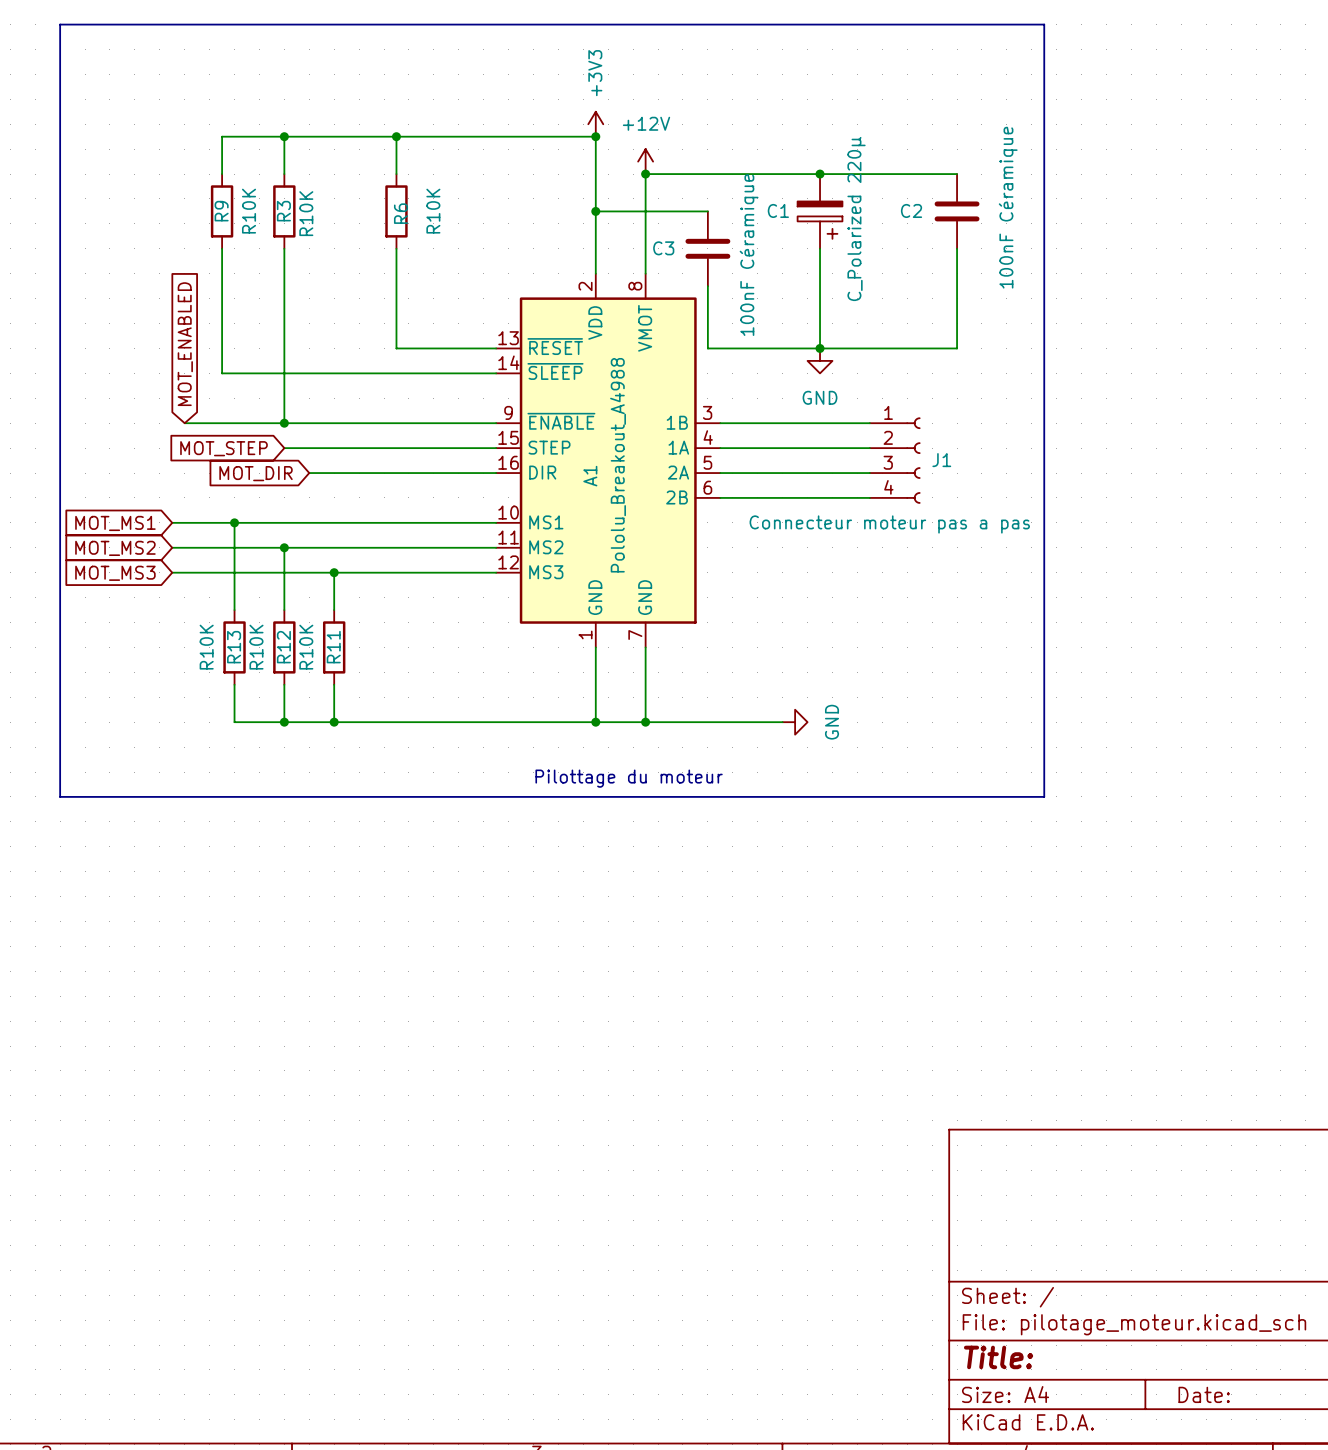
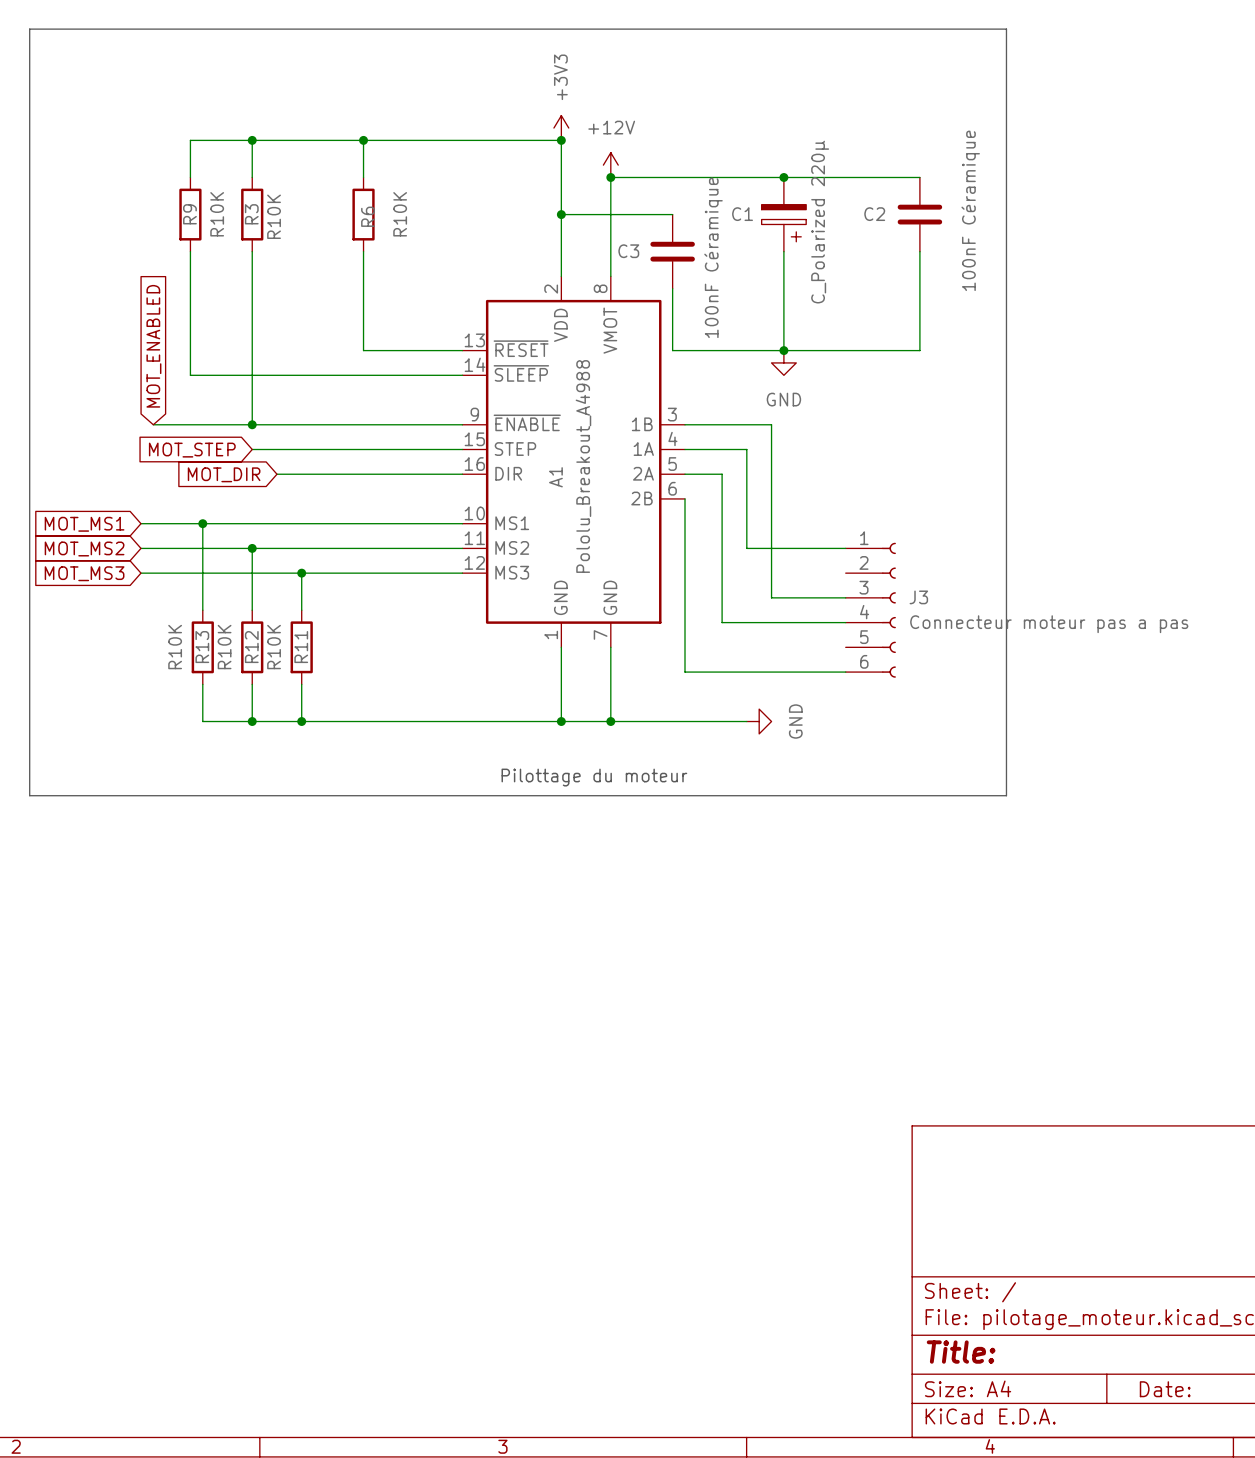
wire: (807, 423) (869, 423) -> (771, 424) (771, 597) (845, 597)
wire: (782, 448) (869, 448) -> (746, 449) (746, 548) (845, 548)
J1: Connecteur moteur pas a pas (895, 460) -> none
wire: (757, 473) (869, 473) -> (722, 474) (722, 622) (845, 622)
wire: (720, 497) (869, 497) -> (685, 498) (685, 672) (845, 672)
J3: none -> Connecteur moteur pas a pas (870, 610)

